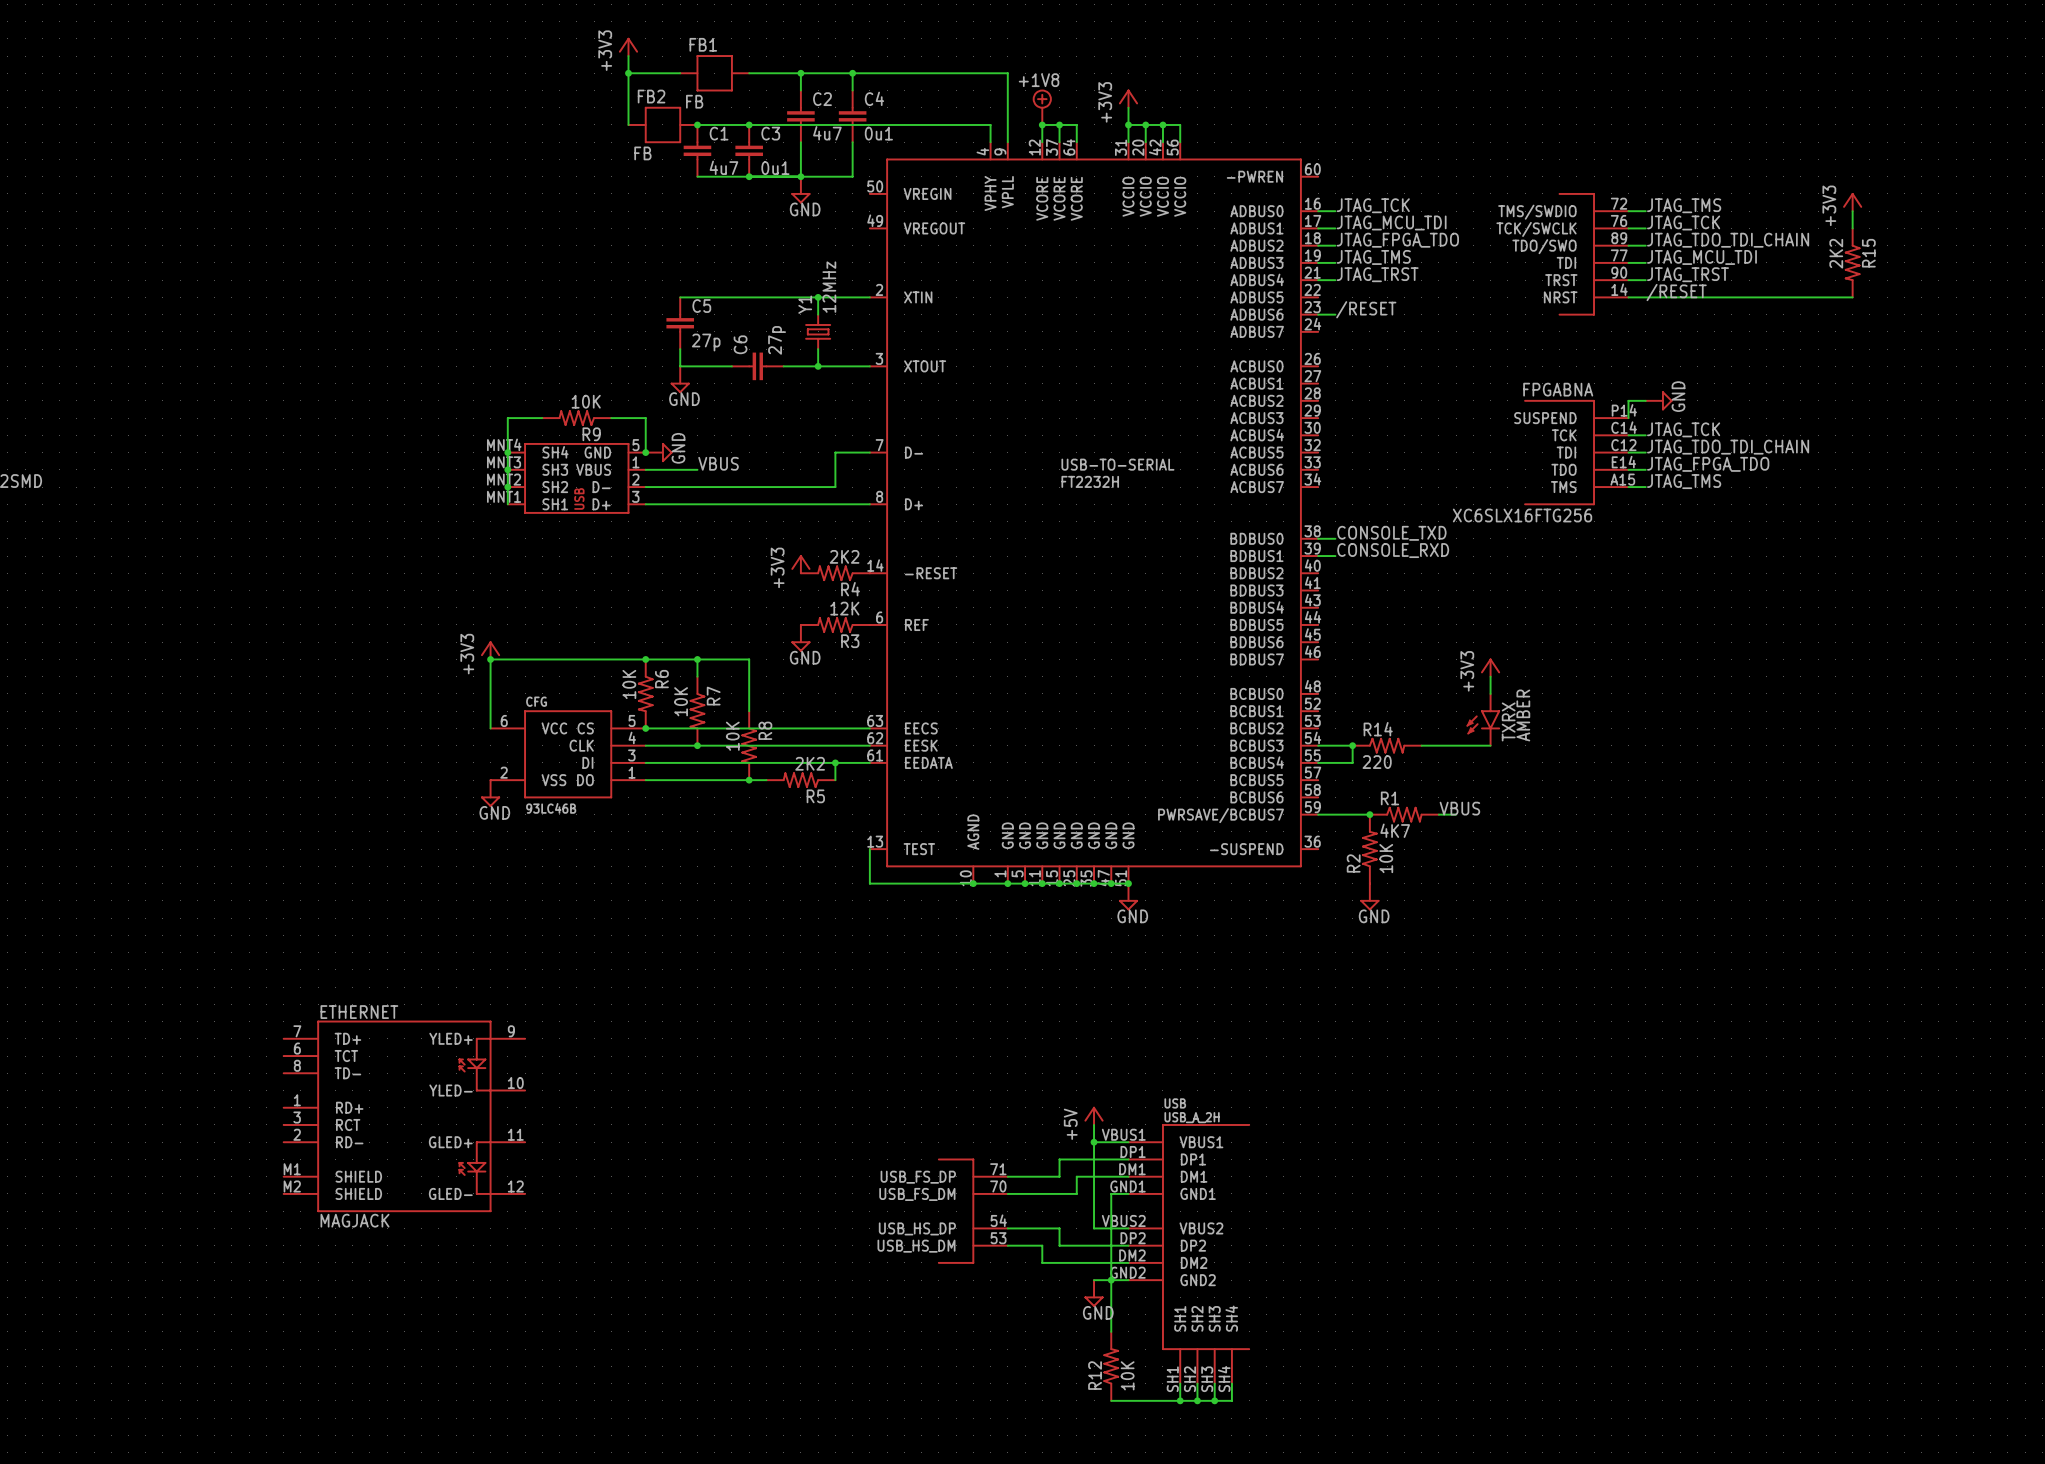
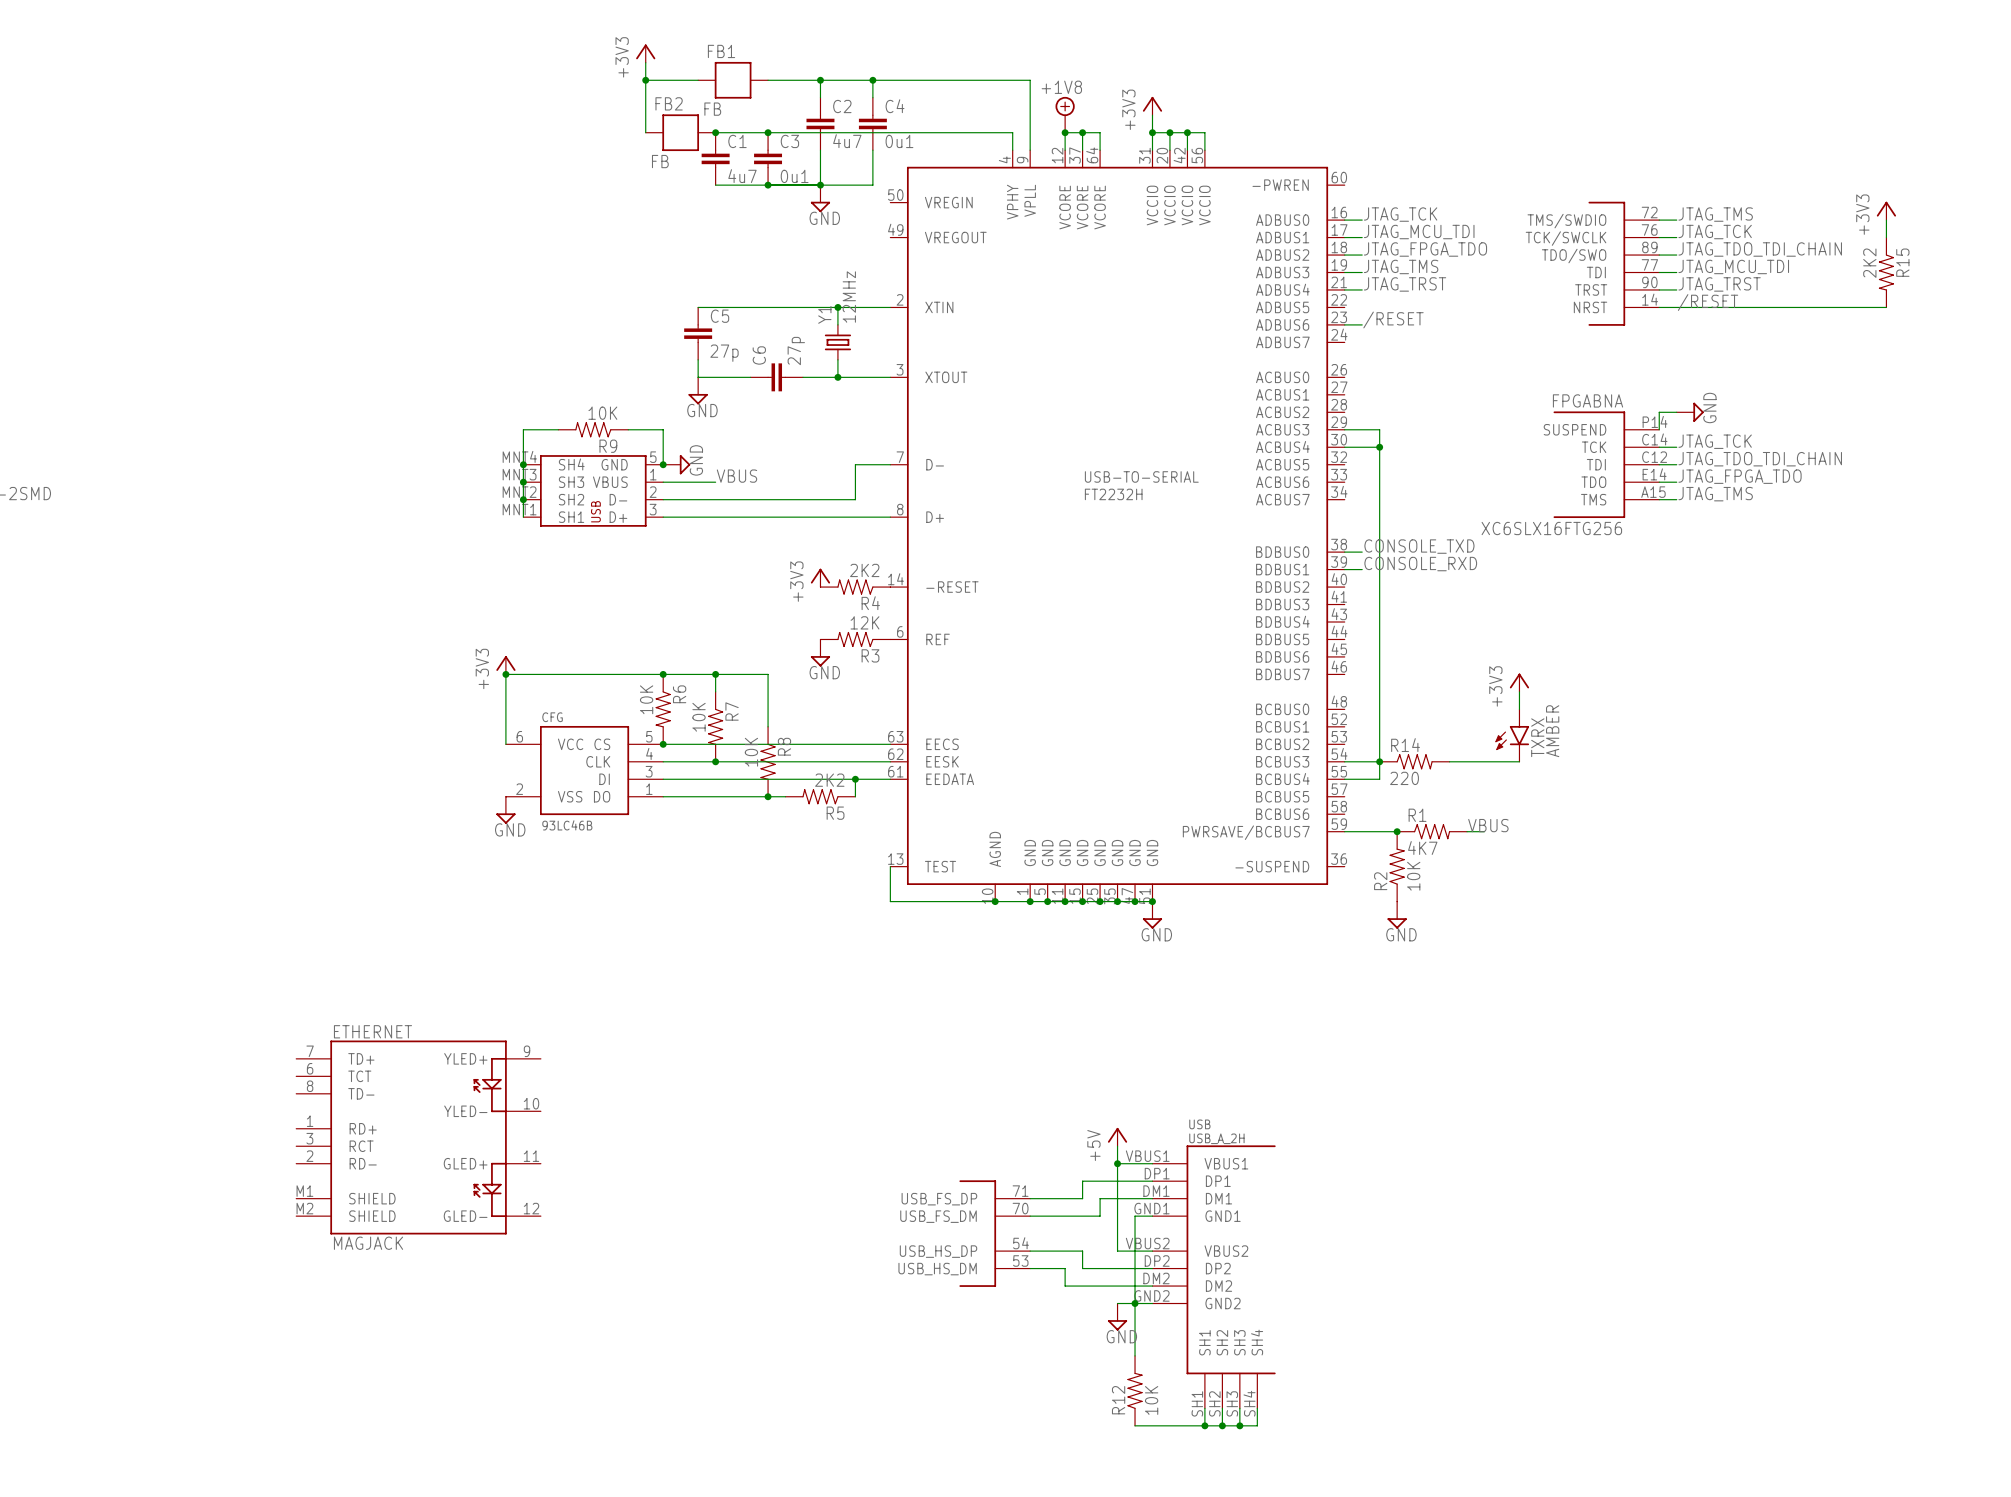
wire: none -> (1344, 429) (1379, 429) (1379, 761)
wire: none -> (1344, 447) (1379, 447)
junction: none -> (1379, 447)

